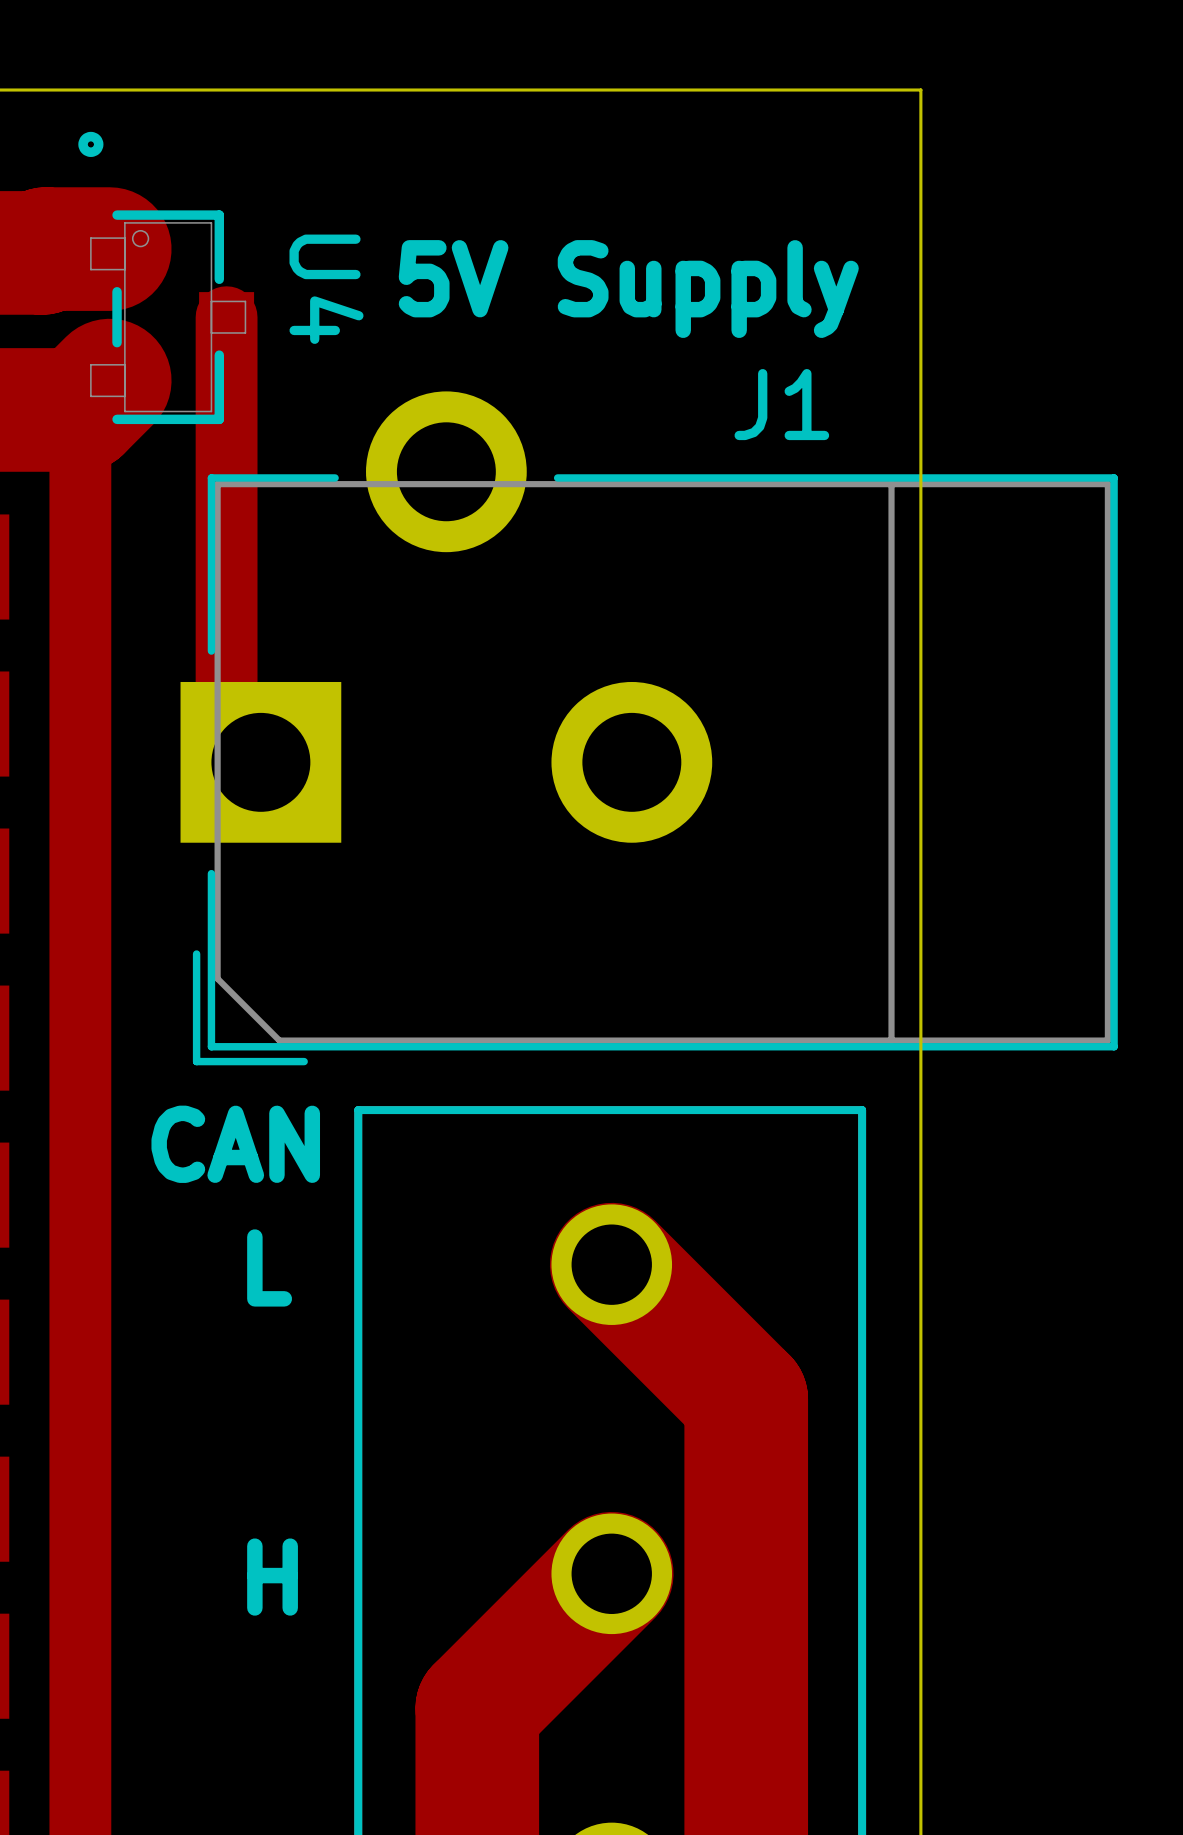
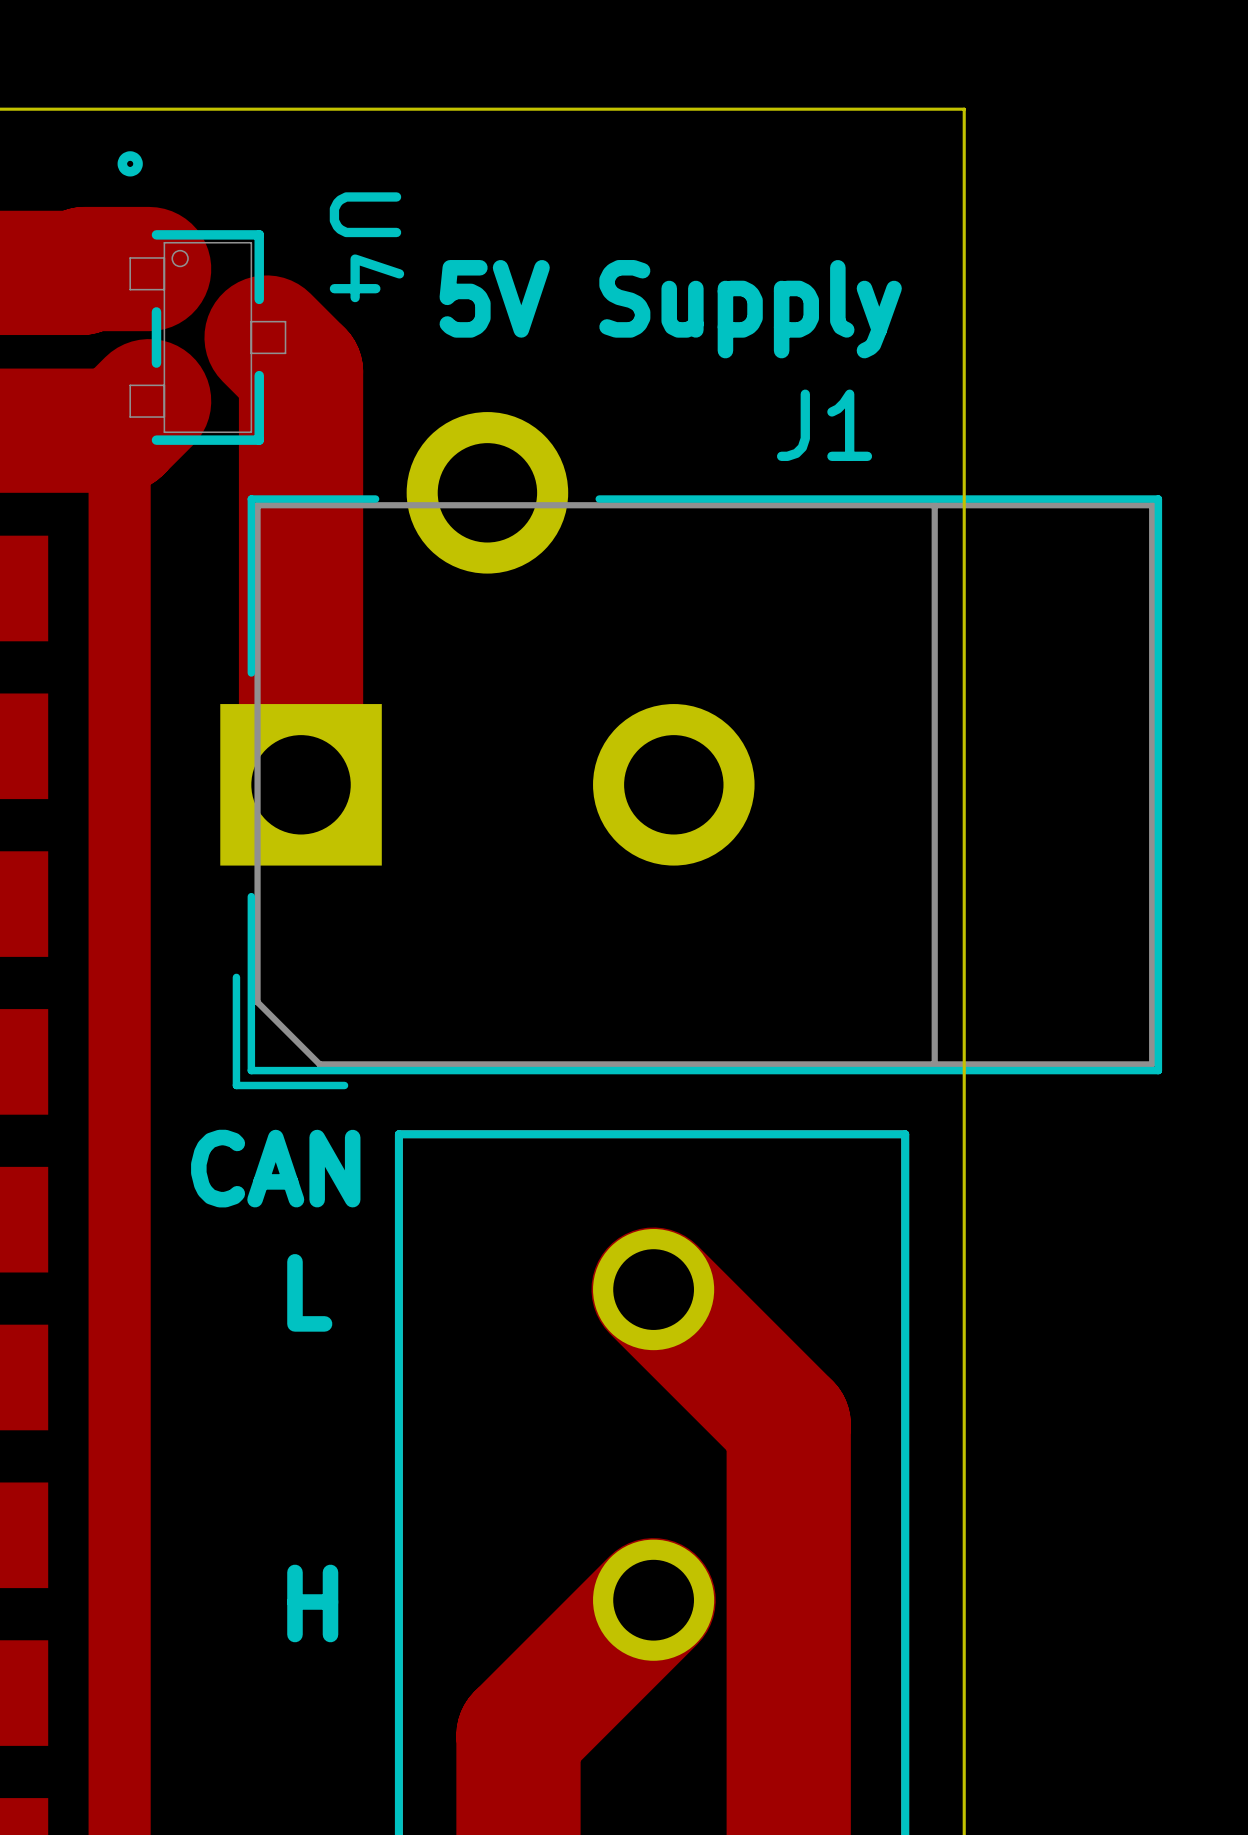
U4 name position: U4 (326, 289) -> U4 (366, 247)
track: (226, 317) (226, 728) -> (266, 337) (301, 371) (301, 784)

